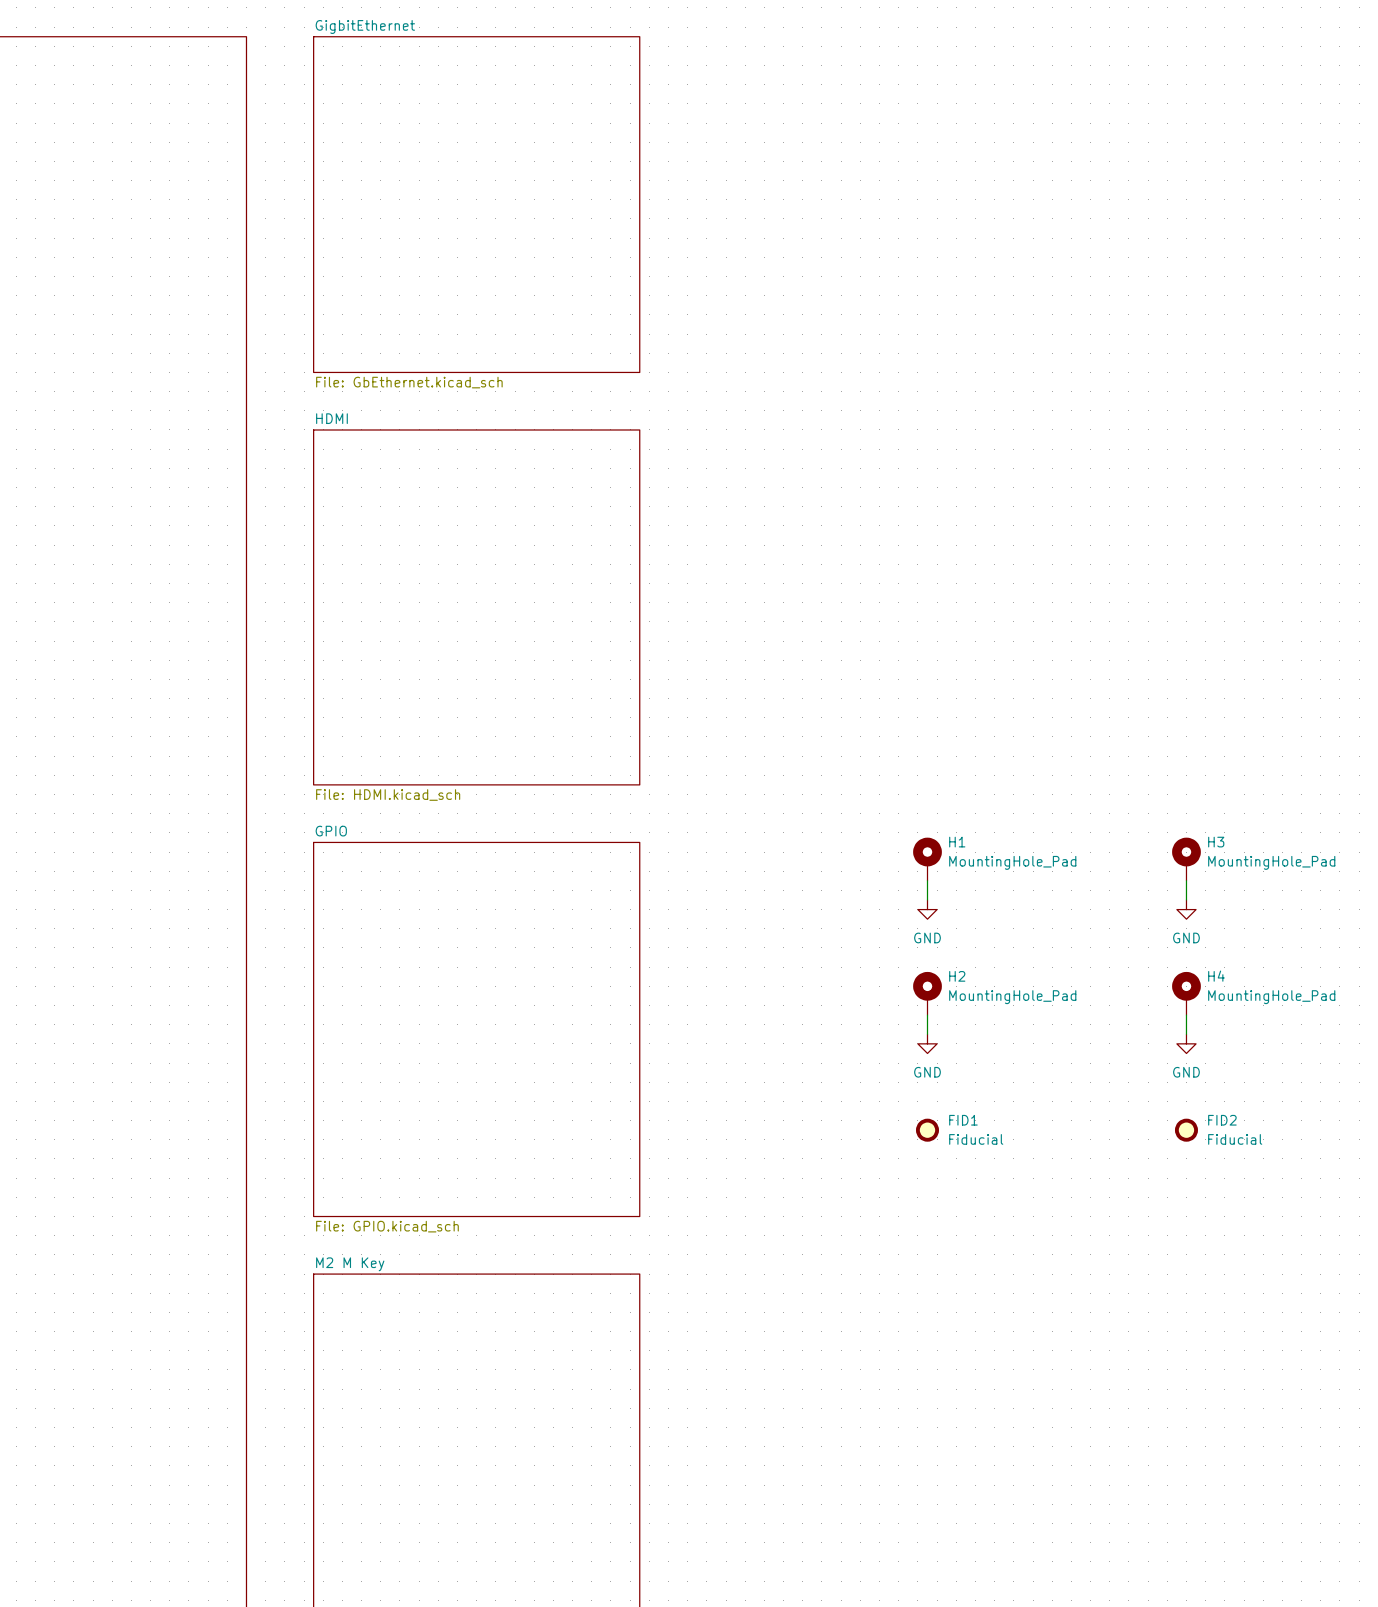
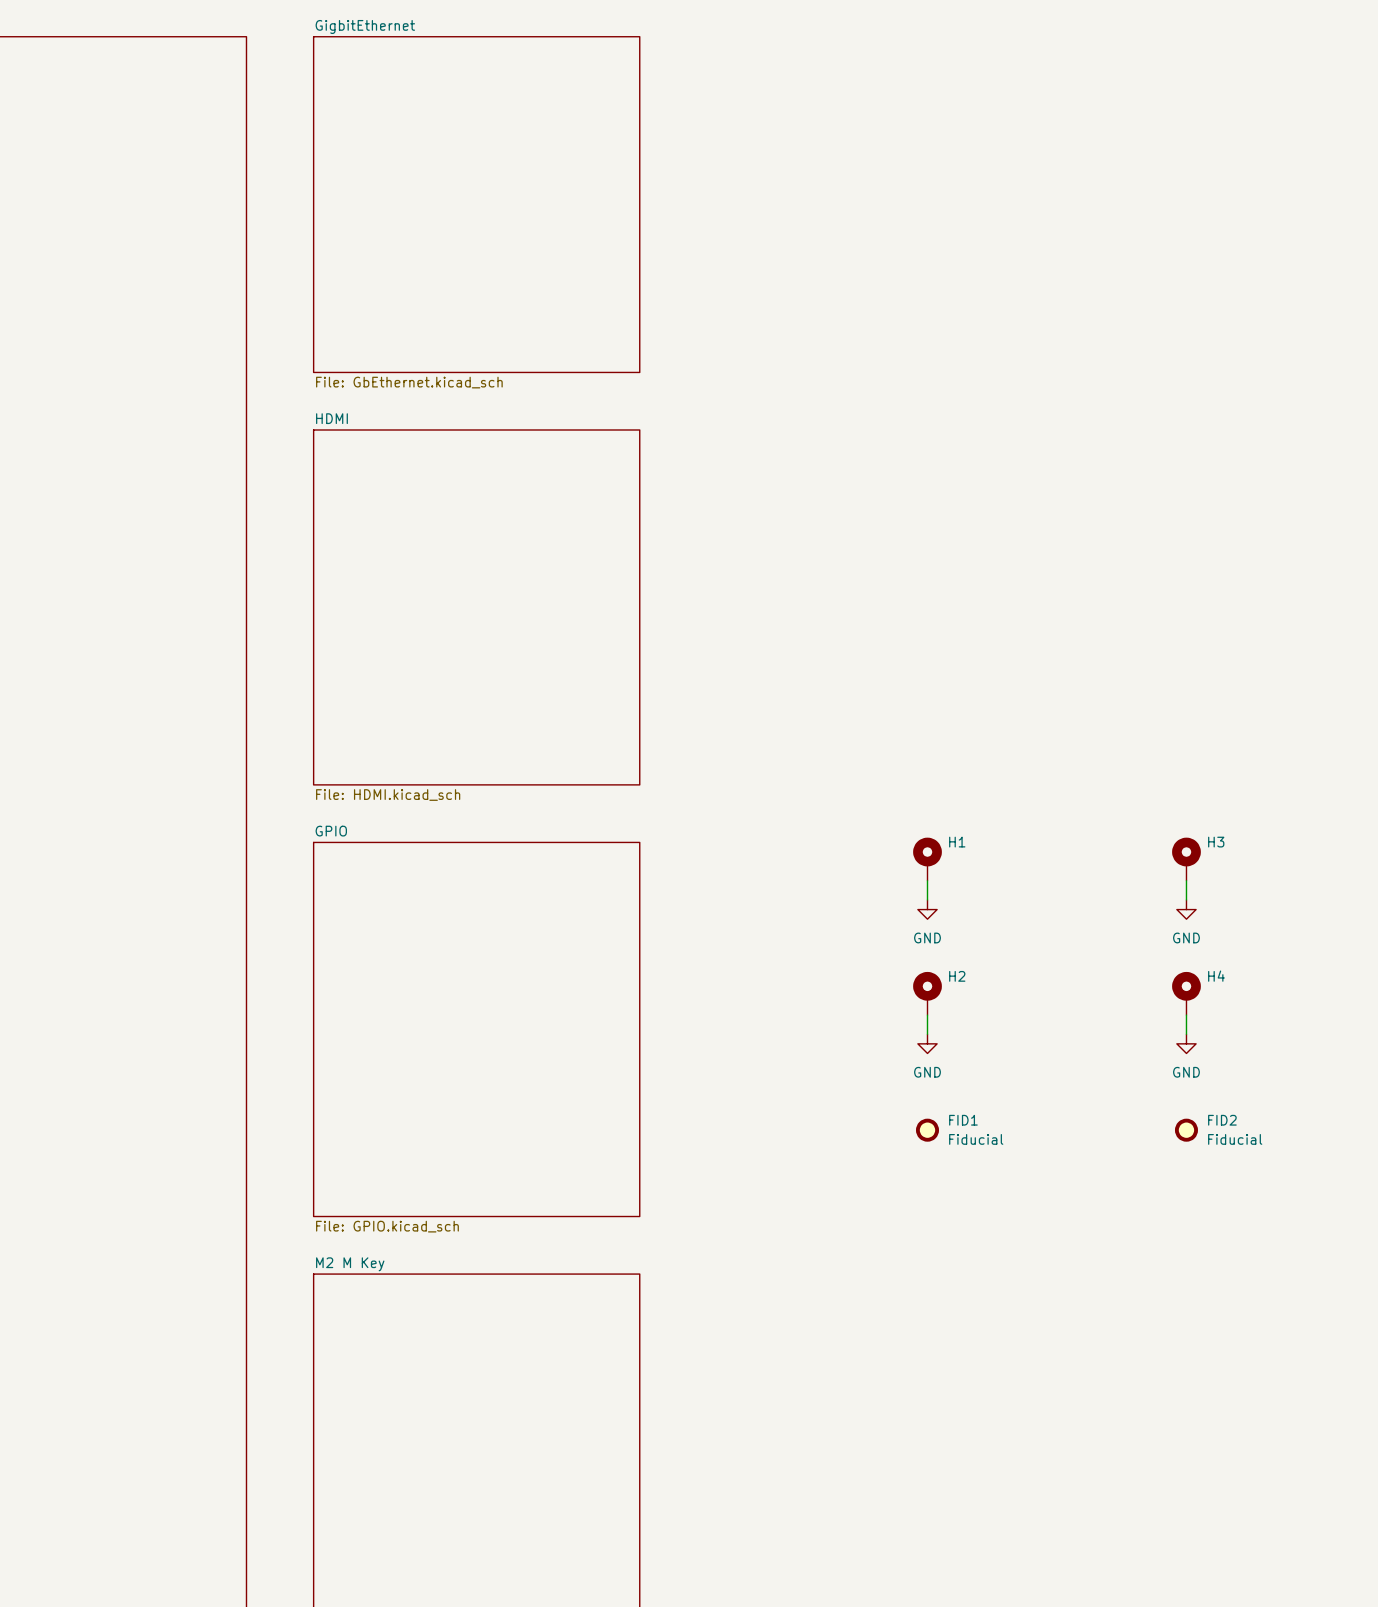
H1 value: MountingHole_Pad (1012, 862) -> none
H3 value: MountingHole_Pad (1271, 862) -> none
H2 value: MountingHole_Pad (1012, 997) -> none
H4 value: MountingHole_Pad (1271, 997) -> none

